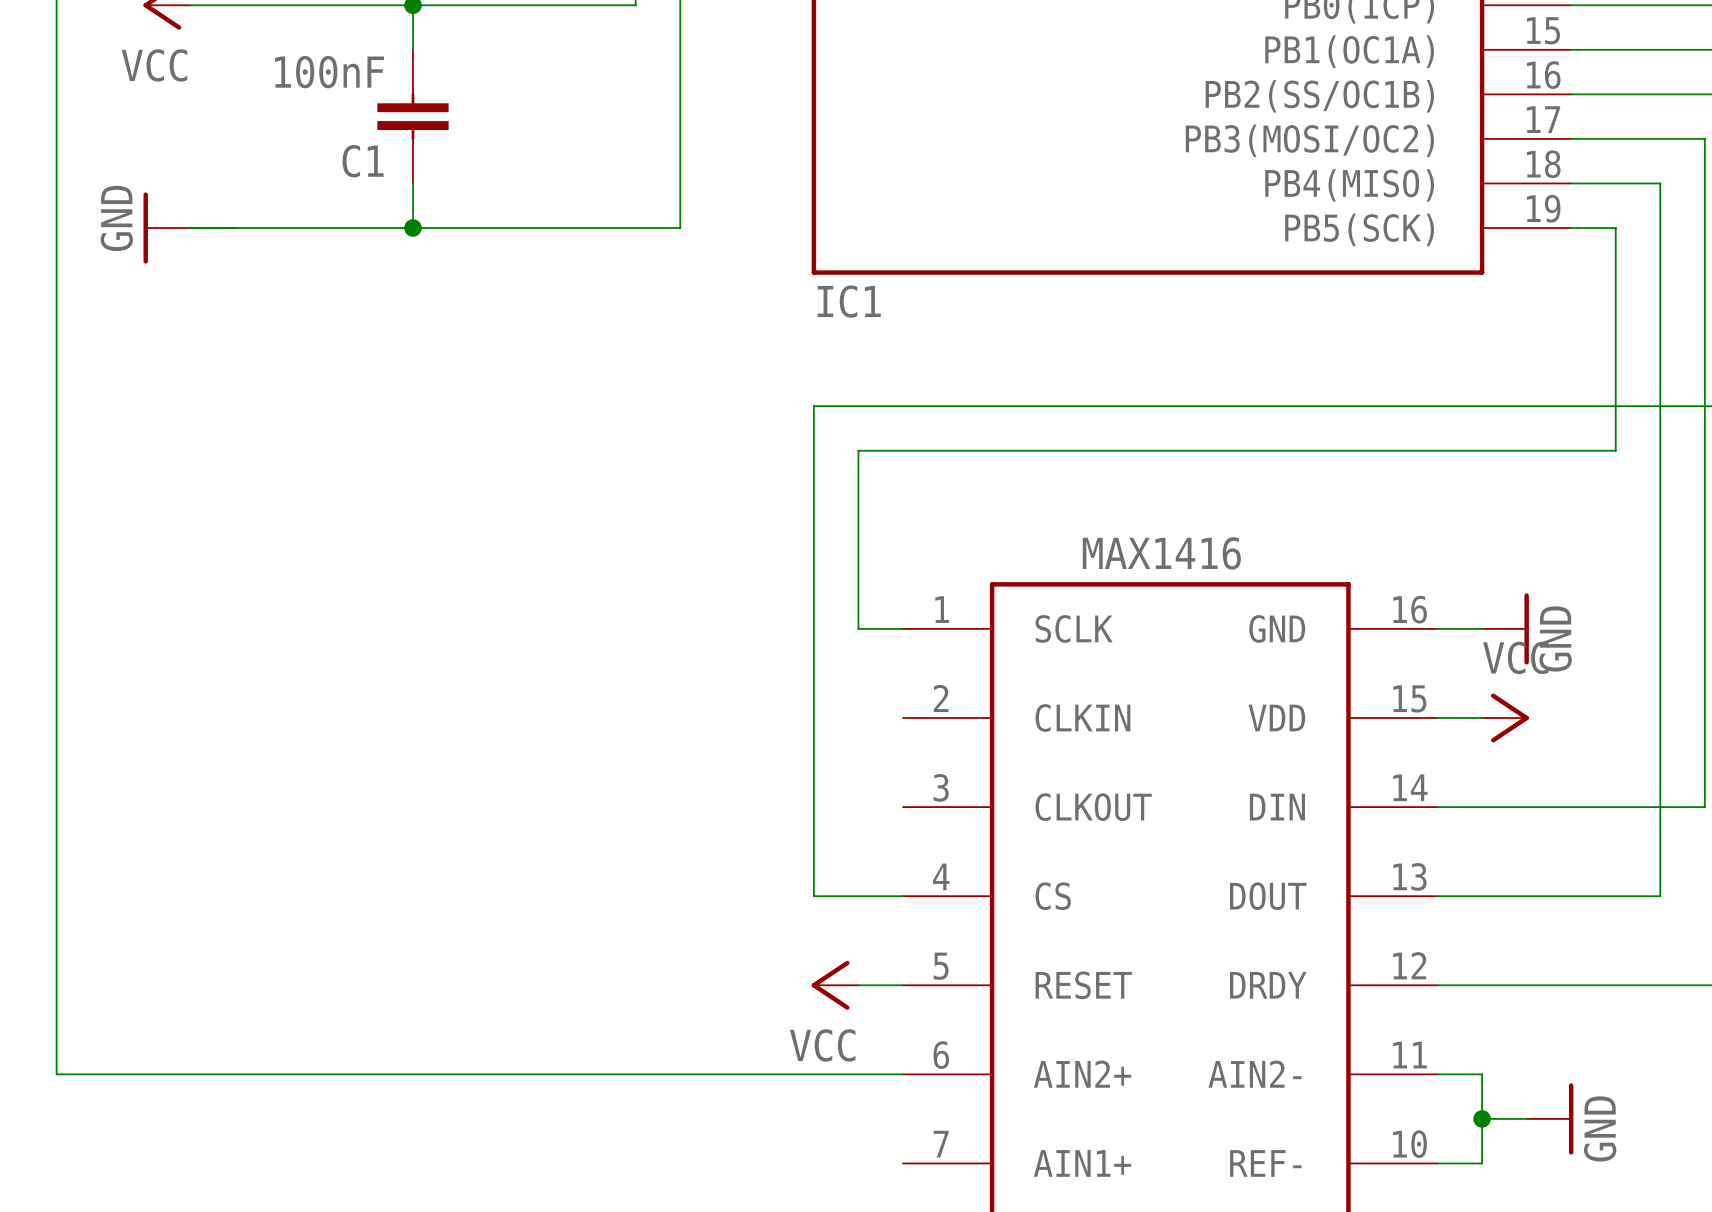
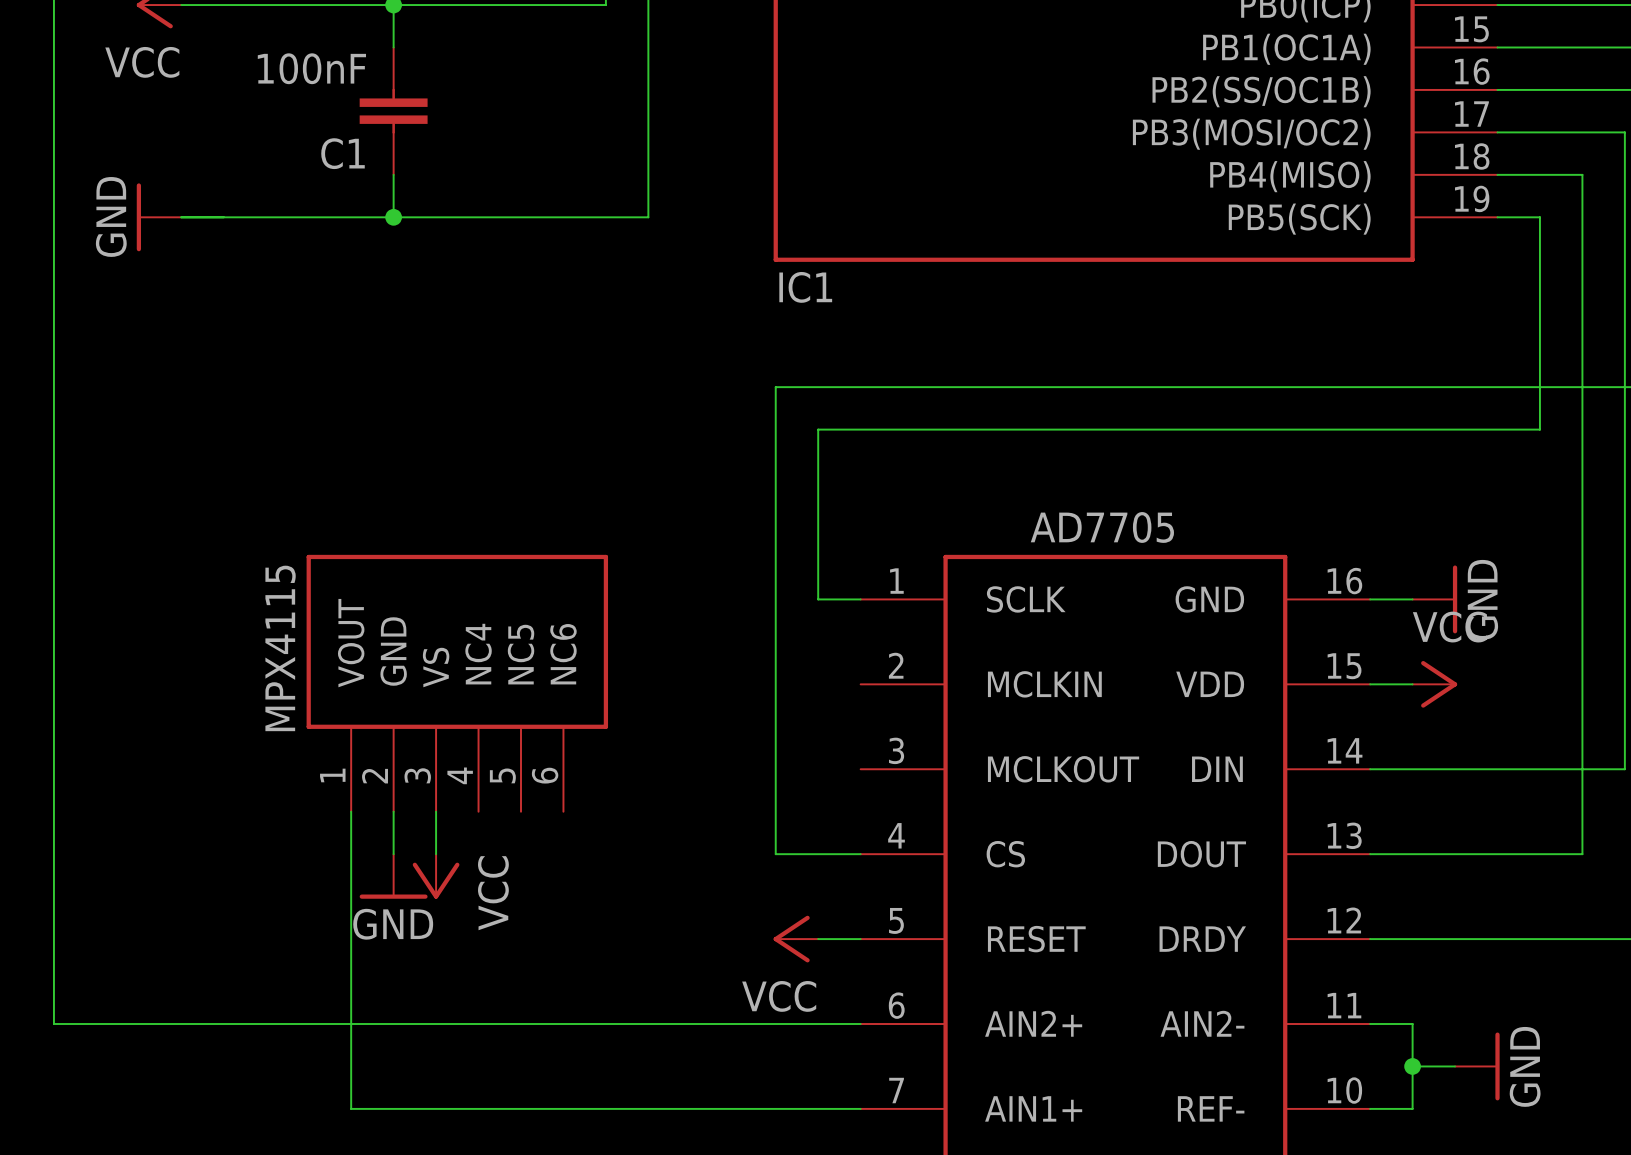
part text: MAX1416 (1161, 553) -> AD7705 (1102, 527)
part: none -> (457, 683)
part pin name: CLKIN (1082, 718) -> MCLKIN (1044, 684)
part pin name: CLKOUT (1093, 807) -> MCLKOUT (1063, 769)
wire: none -> (351, 811) (351, 1108) (860, 1108)
wire: none -> (393, 811) (393, 854)
wire: none -> (436, 811) (436, 854)
power symbol: none -> GND (393, 876)
power symbol: none -> VCC (436, 876)

